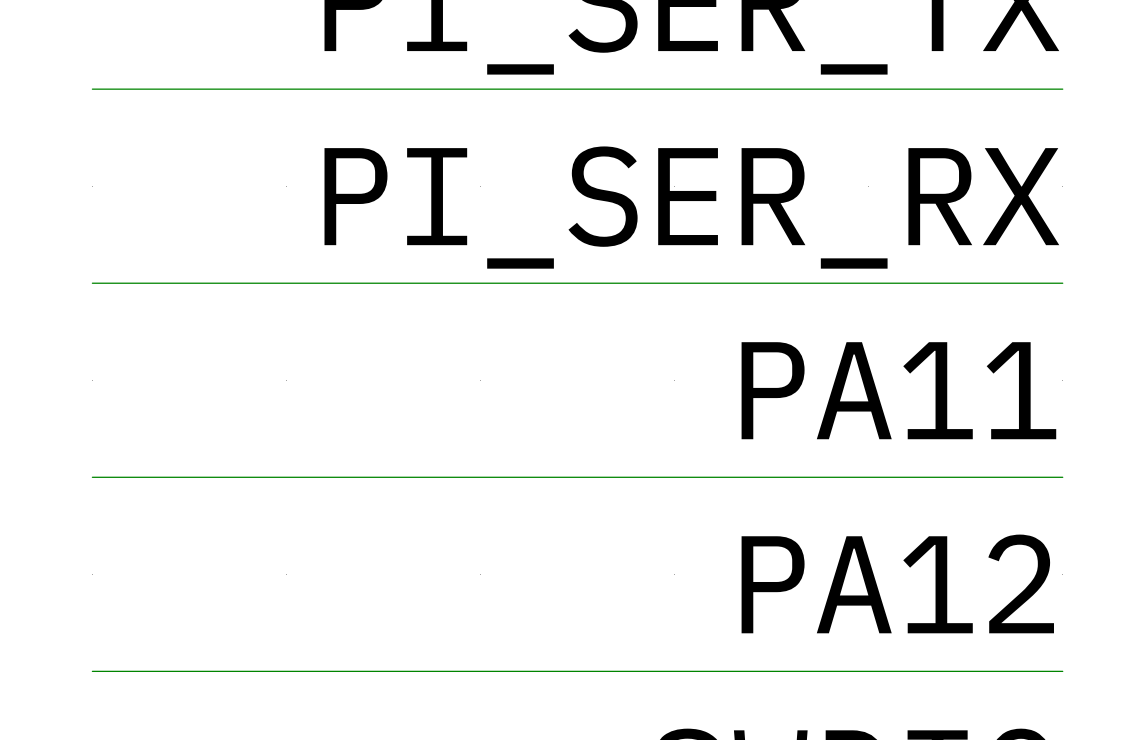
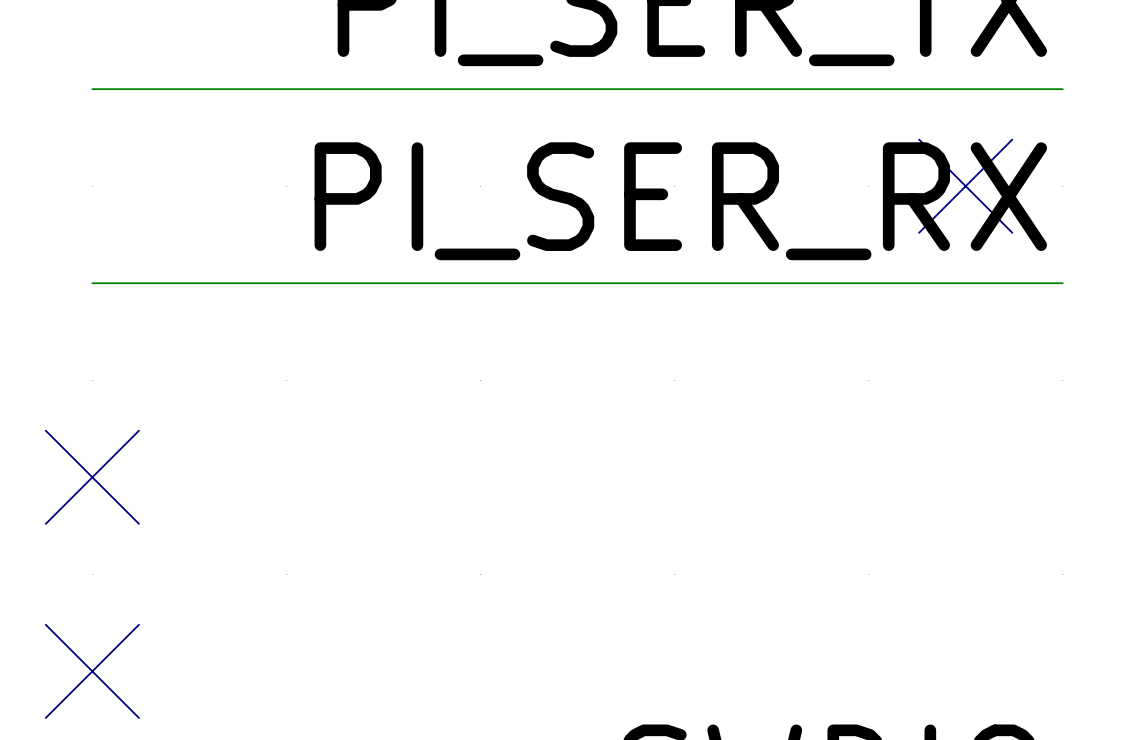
no-connect mark: none -> (965, 186)
label: PA11 (898, 390) -> none
wire: (92, 477) (1062, 477) -> none
no-connect mark: none -> (92, 477)
label: PA12 (897, 583) -> none
wire: (92, 671) (1062, 671) -> none
no-connect mark: none -> (92, 671)

